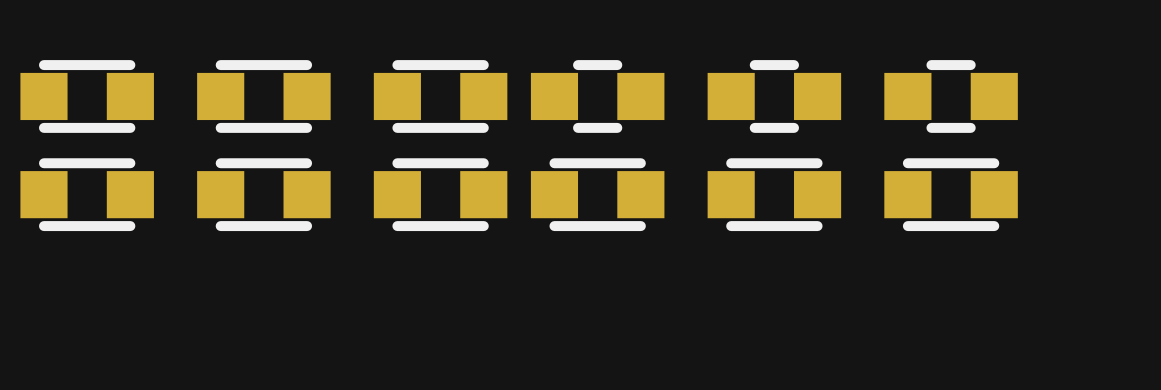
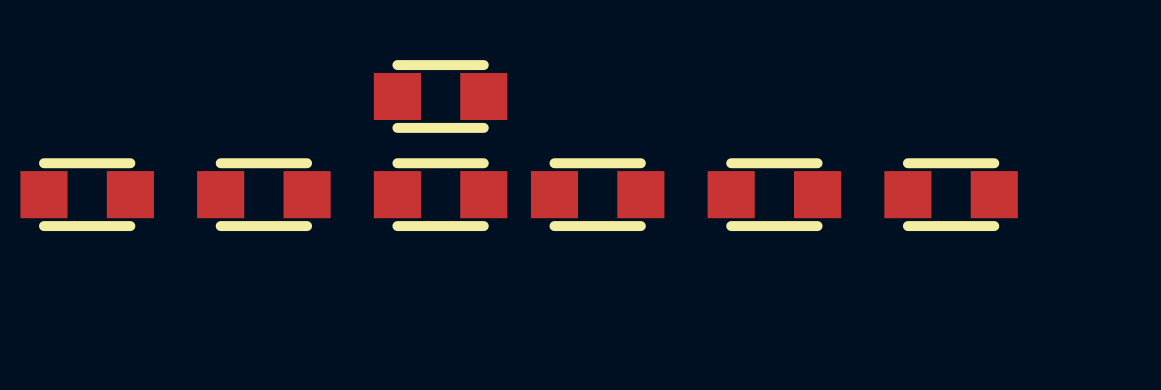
part: (87, 96) -> none
part: (263, 96) -> none
part: (597, 96) -> none
part: (774, 96) -> none
part: (951, 96) -> none

